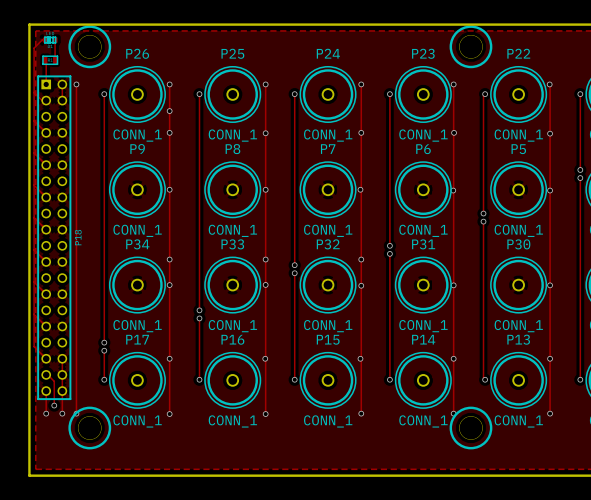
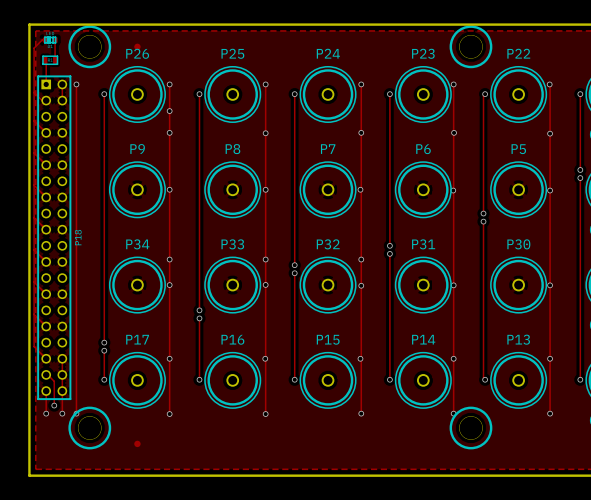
part: none -> (137, 46)
P26 value: CONN_1 (137, 135) -> none
P25 value: CONN_1 (232, 135) -> none
P24 value: CONN_1 (328, 135) -> none
P23 value: CONN_1 (423, 135) -> none
P22 value: CONN_1 (518, 135) -> none
P9 value: CONN_1 (137, 230) -> none
P8 value: CONN_1 (232, 230) -> none
P7 value: CONN_1 (328, 230) -> none
P6 value: CONN_1 (423, 230) -> none
P5 value: CONN_1 (518, 230) -> none
P34 value: CONN_1 (137, 326) -> none
P33 value: CONN_1 (232, 326) -> none
P32 value: CONN_1 (328, 326) -> none
P31 value: CONN_1 (423, 326) -> none
P30 value: CONN_1 (518, 326) -> none
P17 value: CONN_1 (137, 421) -> none
P16 value: CONN_1 (232, 421) -> none
P15 value: CONN_1 (328, 421) -> none
P14 value: CONN_1 (423, 421) -> none
P13 value: CONN_1 (518, 421) -> none
part: none -> (137, 443)

